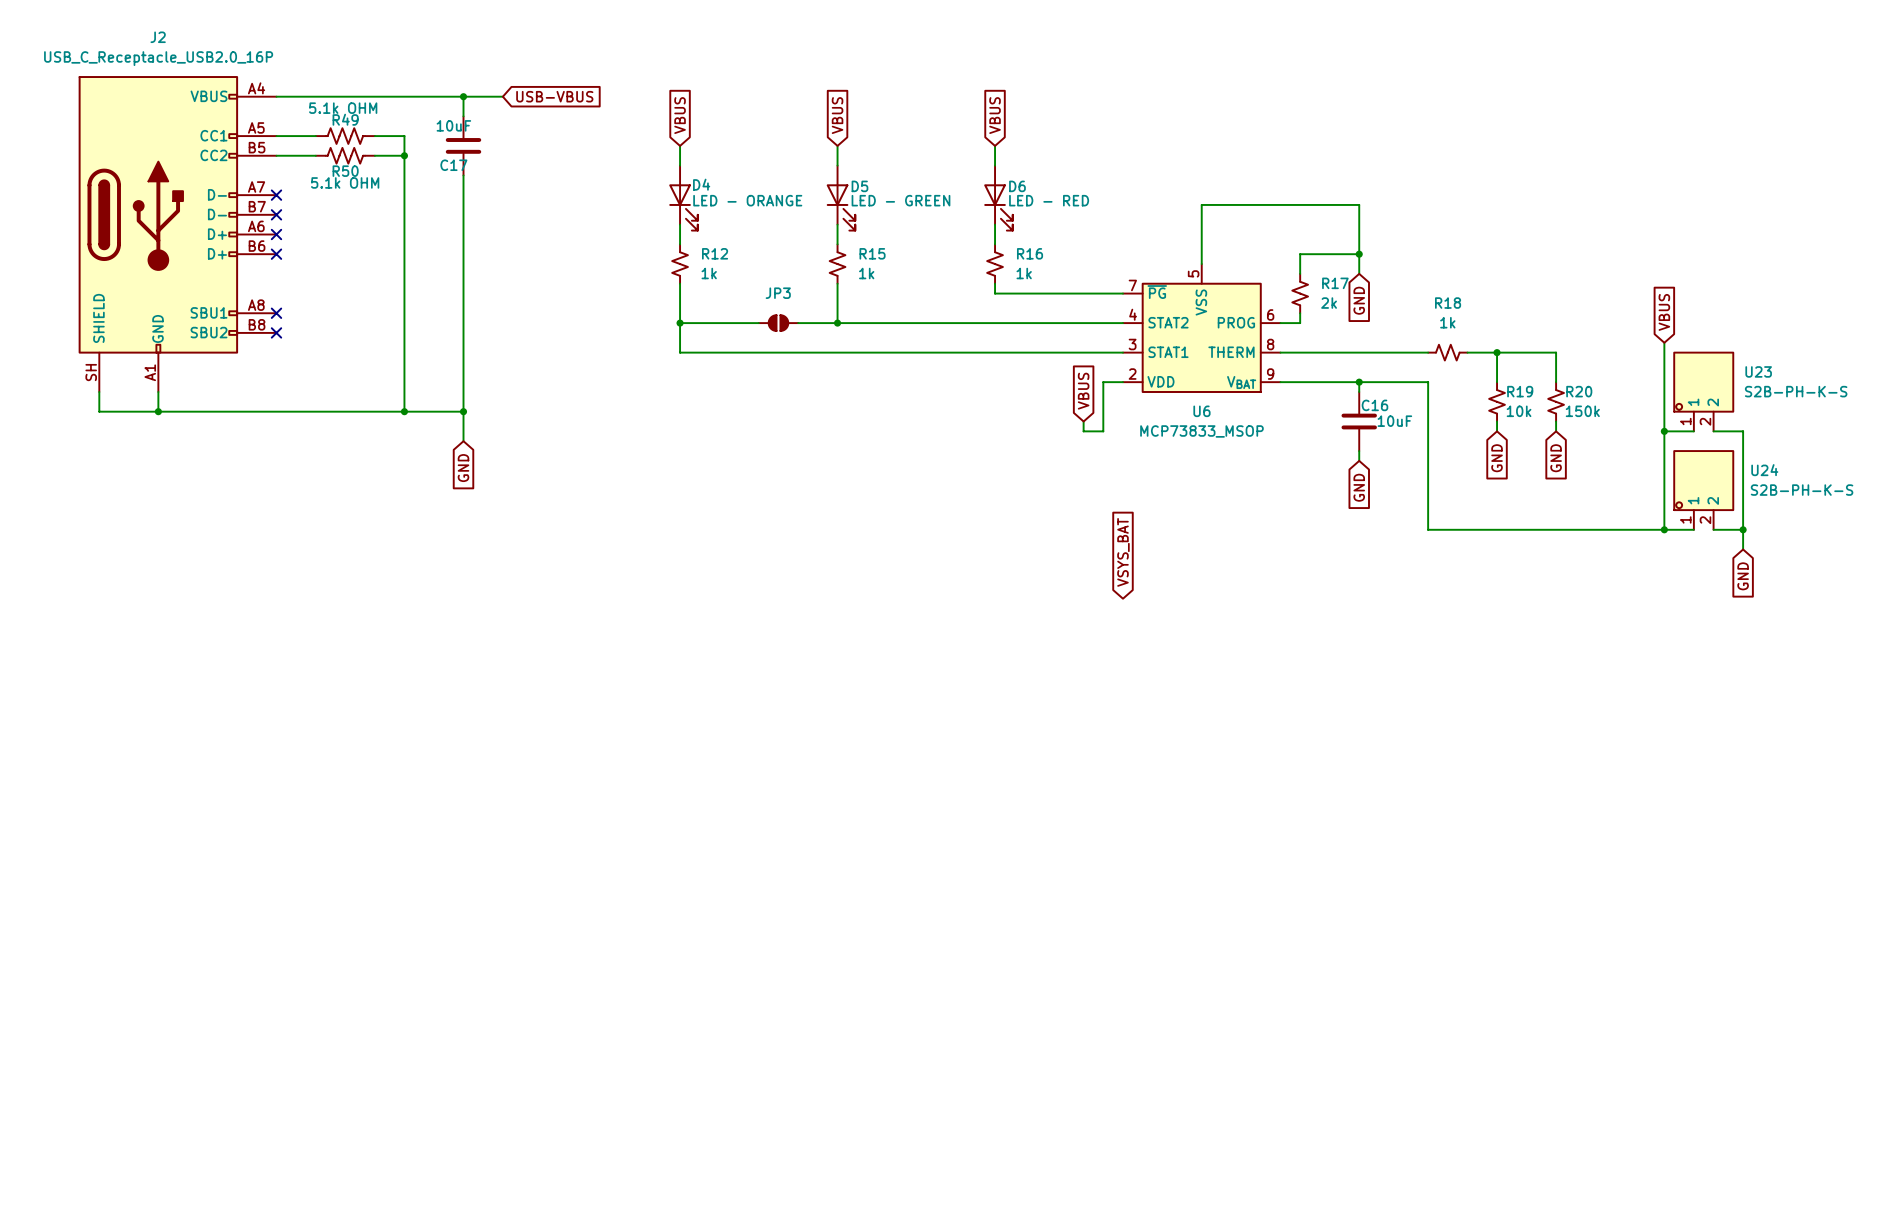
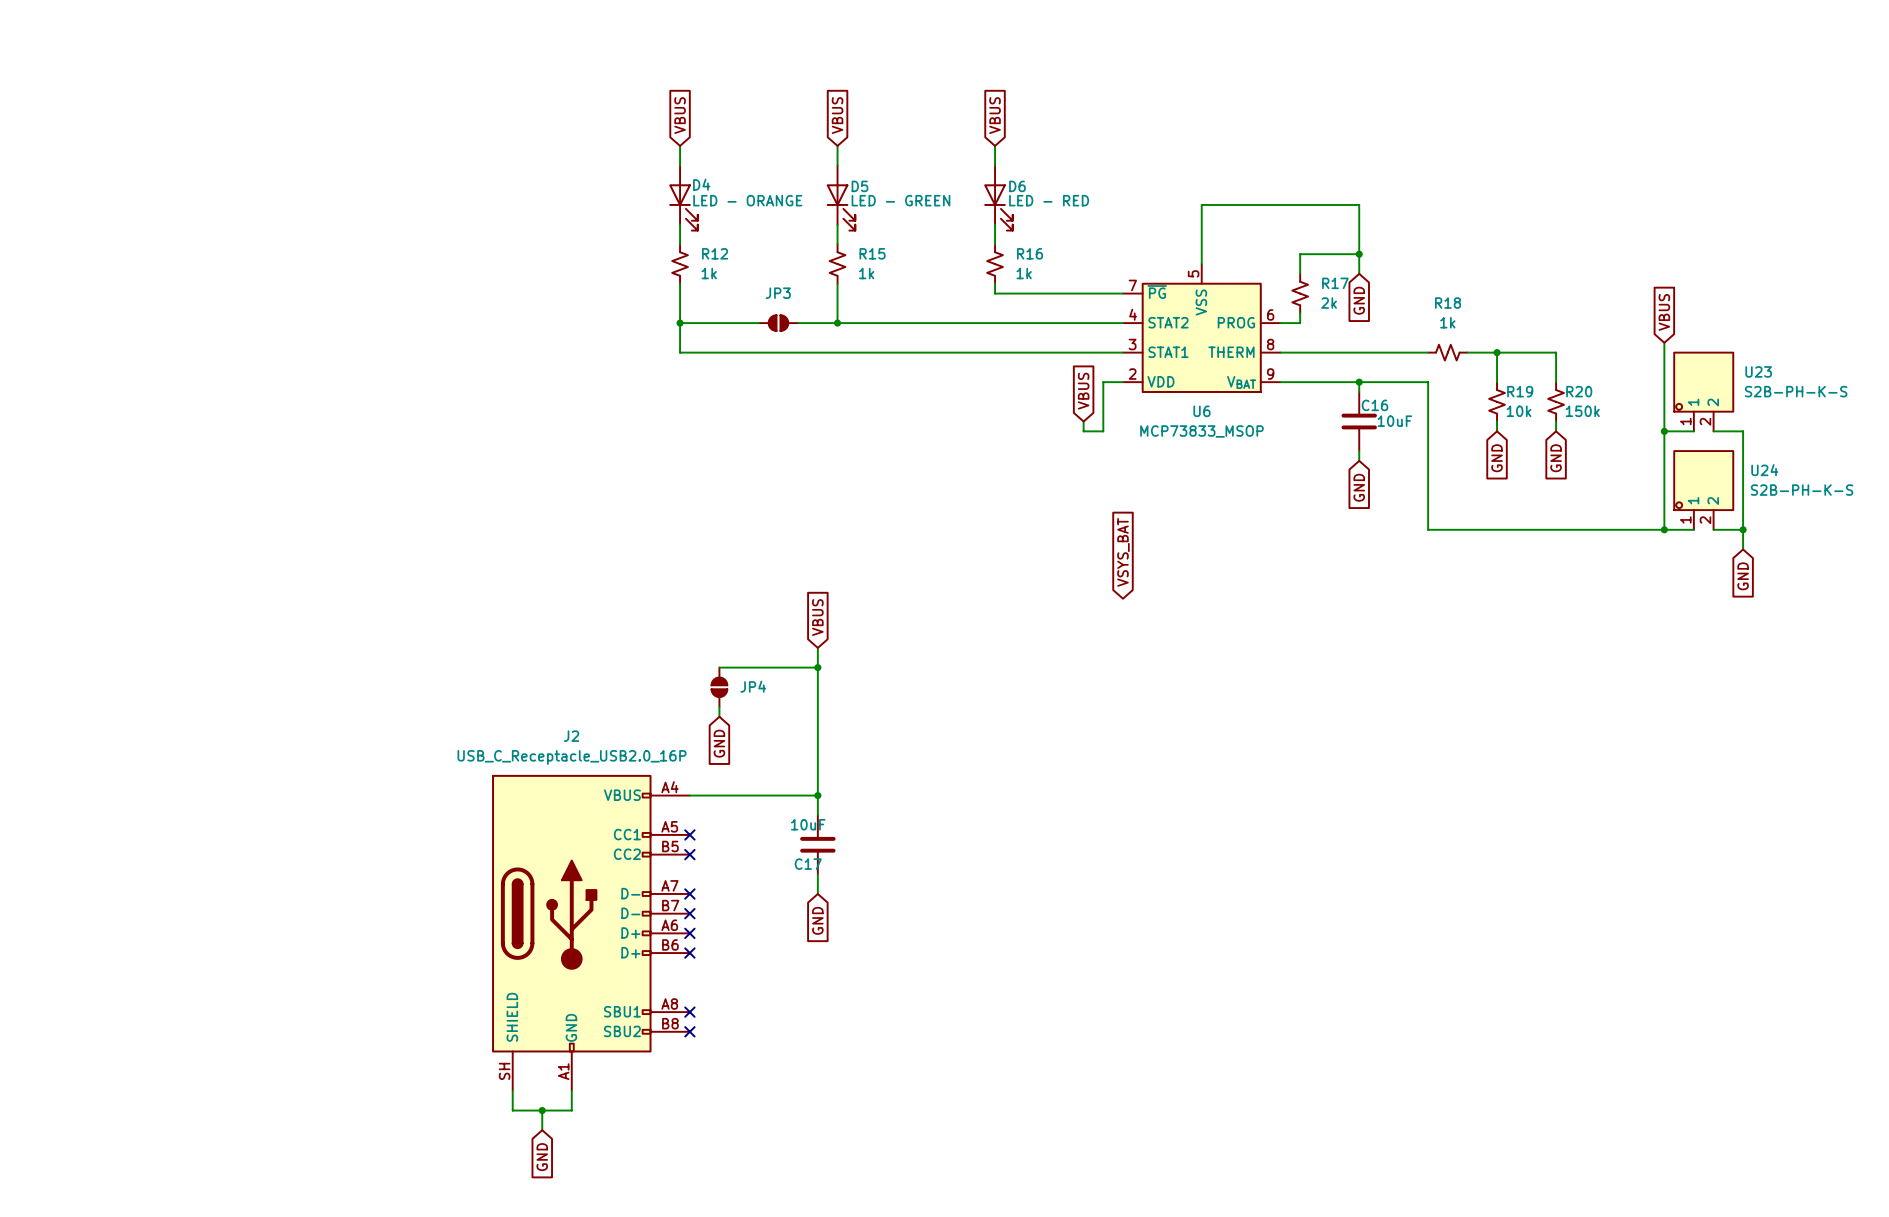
wire: (276, 96) (502, 96) -> none
wire: (463, 96) (463, 116) -> none
junction: (463, 96) -> none
global label: USB-VBUS (554, 96) -> none
wire: (276, 136) (315, 136) -> none
R49: 5.1k OHM (345, 136) -> none
wire: (374, 136) (404, 136) (404, 411) -> none
C17 position: (463, 145) -> (817, 844)
wire: (276, 155) (315, 155) -> none
R50: 5.1k OHM (345, 155) -> none
wire: (374, 155) (404, 155) -> none
junction: (404, 155) -> none
wire: (463, 175) (463, 441) -> none
no-connect mark: (276, 195) -> none
no-connect mark: (276, 214) -> none
J2 position: (177, 234) -> (590, 932)
no-connect mark: (276, 234) -> none
no-connect mark: (276, 254) -> none
no-connect mark: (276, 313) -> none
no-connect mark: (276, 332) -> none
wire: (99, 391) (99, 411) (463, 411) -> none
wire: (158, 391) (158, 411) -> none
junction: (158, 411) -> none
junction: (404, 411) -> none
junction: (463, 411) -> none
global label: GND (463, 468) -> none
global label: none -> VBUS (817, 617)
wire: none -> (817, 647) (817, 815)
wire: none -> (719, 667) (817, 667)
junction: none -> (817, 667)
JP4: none -> (719, 687)
wire: none -> (719, 706) (719, 716)
global label: none -> GND (719, 743)
wire: none -> (689, 795) (817, 795)
junction: none -> (817, 795)
no-connect mark: none -> (689, 834)
no-connect mark: none -> (689, 854)
wire: none -> (817, 874) (817, 893)
no-connect mark: none -> (689, 893)
no-connect mark: none -> (689, 913)
global label: none -> GND (817, 920)
no-connect mark: none -> (689, 933)
no-connect mark: none -> (689, 953)
no-connect mark: none -> (689, 1012)
no-connect mark: none -> (689, 1031)
wire: none -> (512, 1090) (512, 1110) (571, 1110) (571, 1090)
wire: none -> (542, 1110) (542, 1130)
junction: none -> (542, 1110)
global label: none -> GND (542, 1157)

